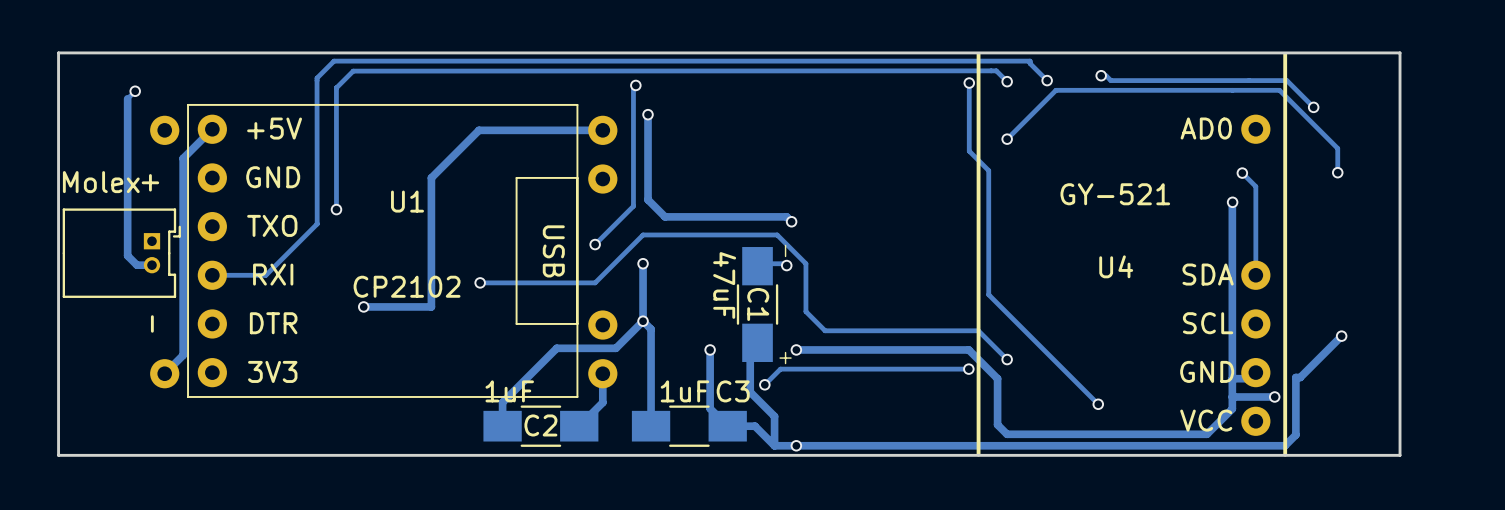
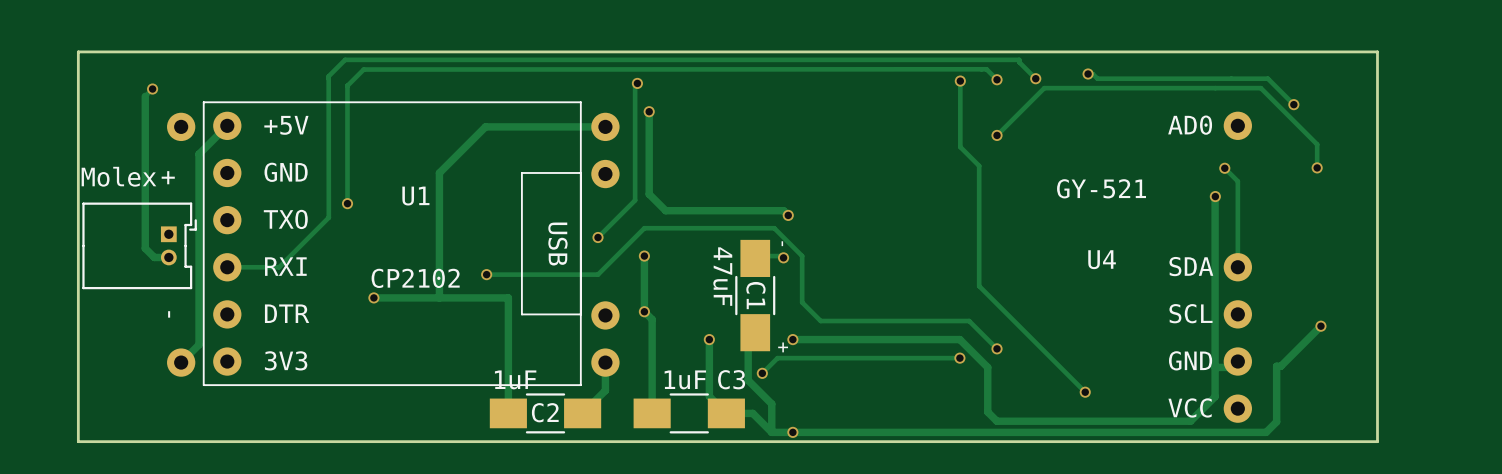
line: (978, 54) (978, 454) -> none
line: (1285, 54) (1285, 454) -> none
track: (643, 321) (615, 348) (556, 348) (502, 402) -> (439, 297) (508, 297) (508, 390)
track: (1274, 396) (1232, 396) -> none
via: (1274, 396) -> none

